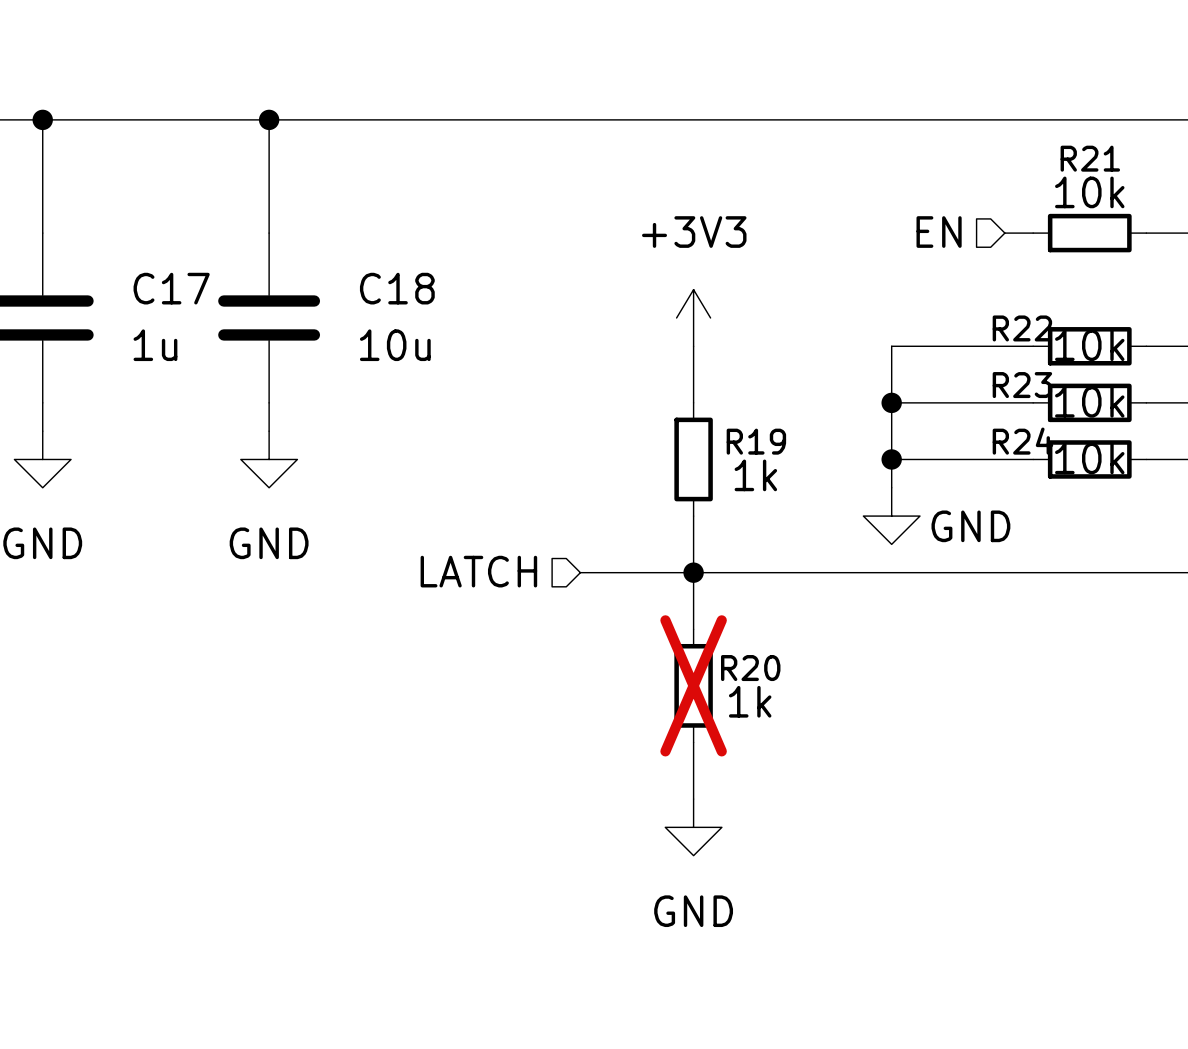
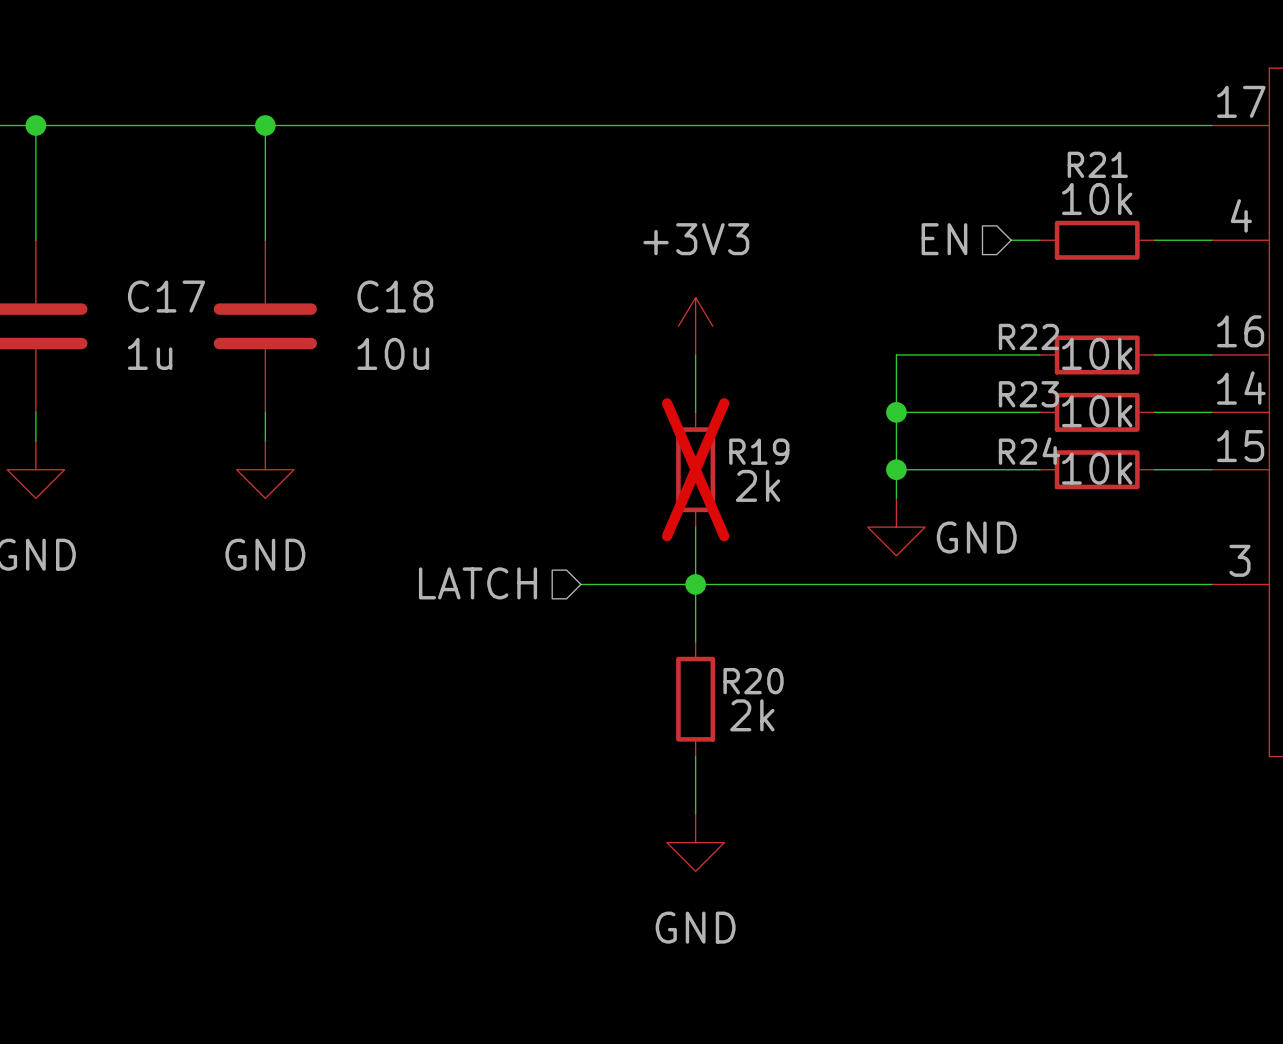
R19 do-not-place cross: none -> (695, 469)
R19 value: 1k (755, 475) -> 2k (758, 485)
R20 do-not-place cross: (693, 685) -> none
R20 value: 1k (750, 701) -> 2k (752, 715)

